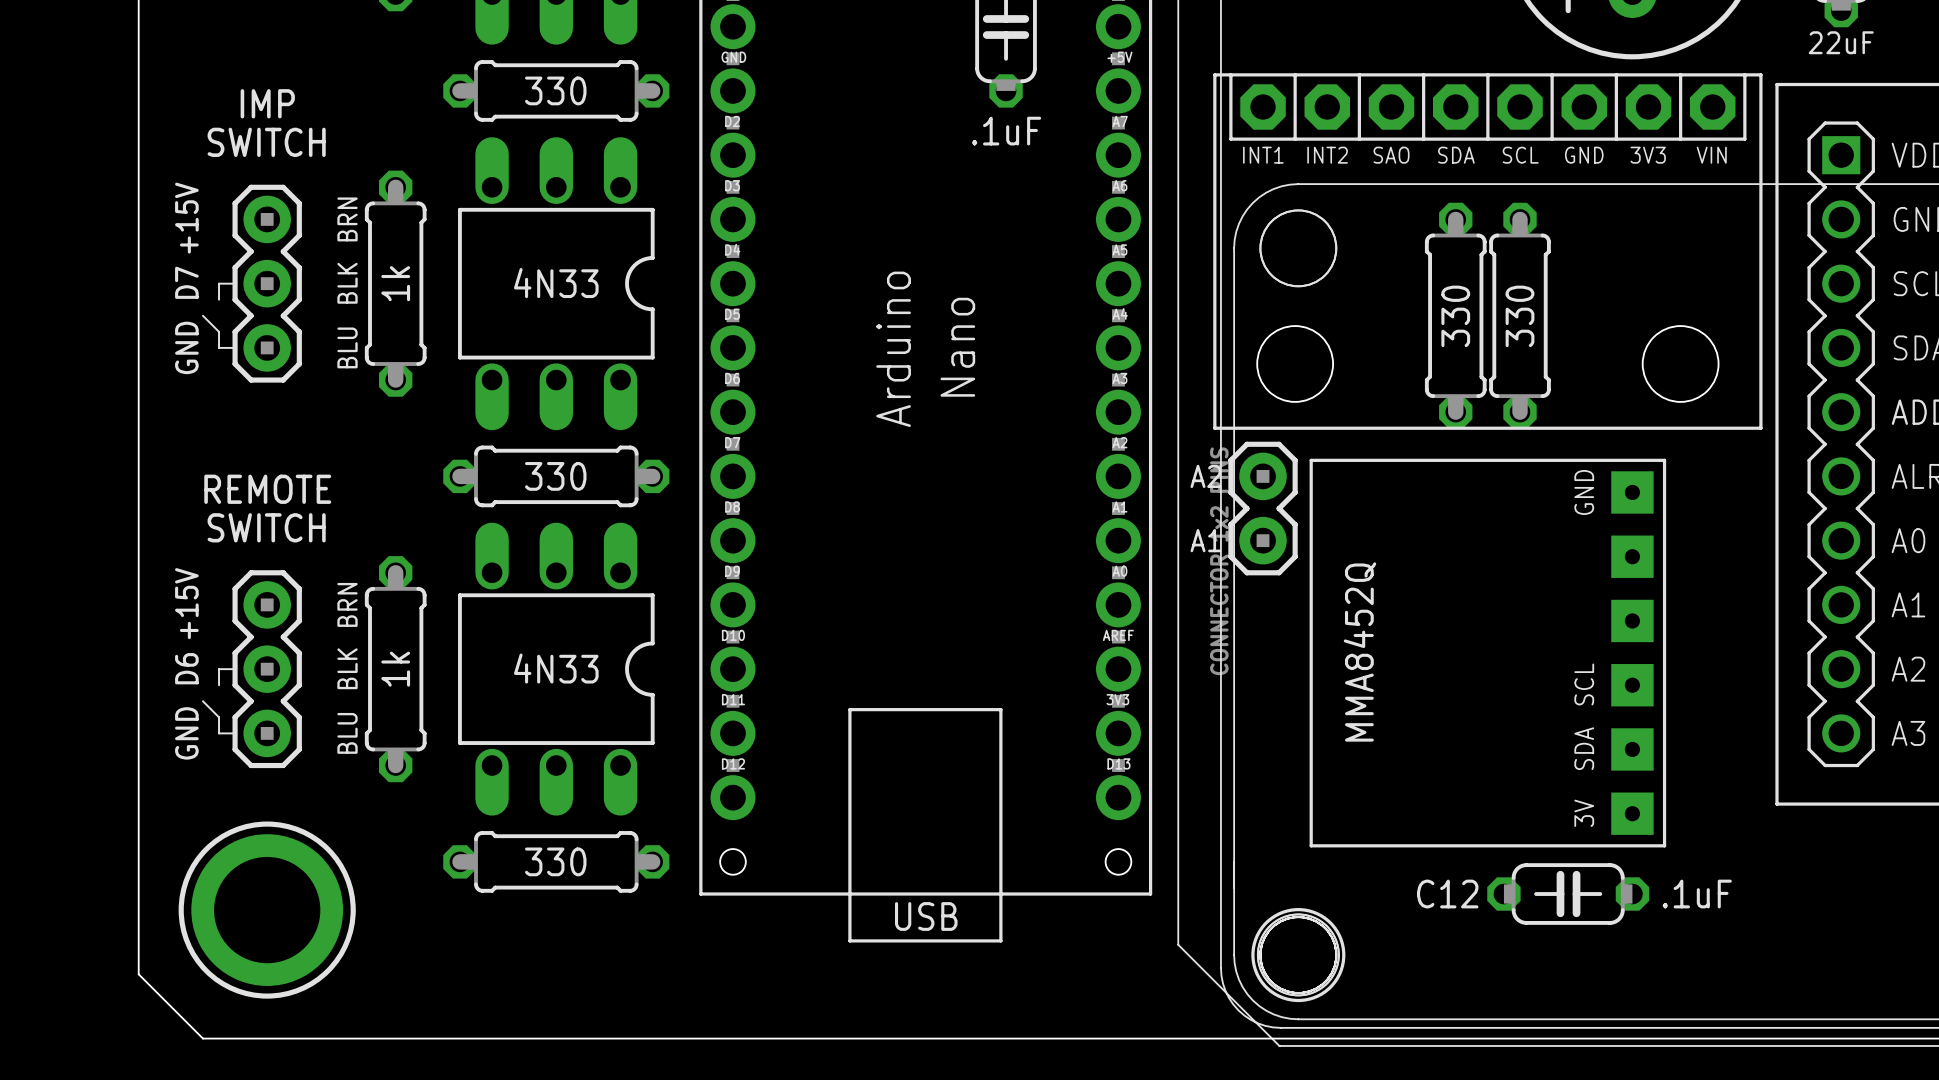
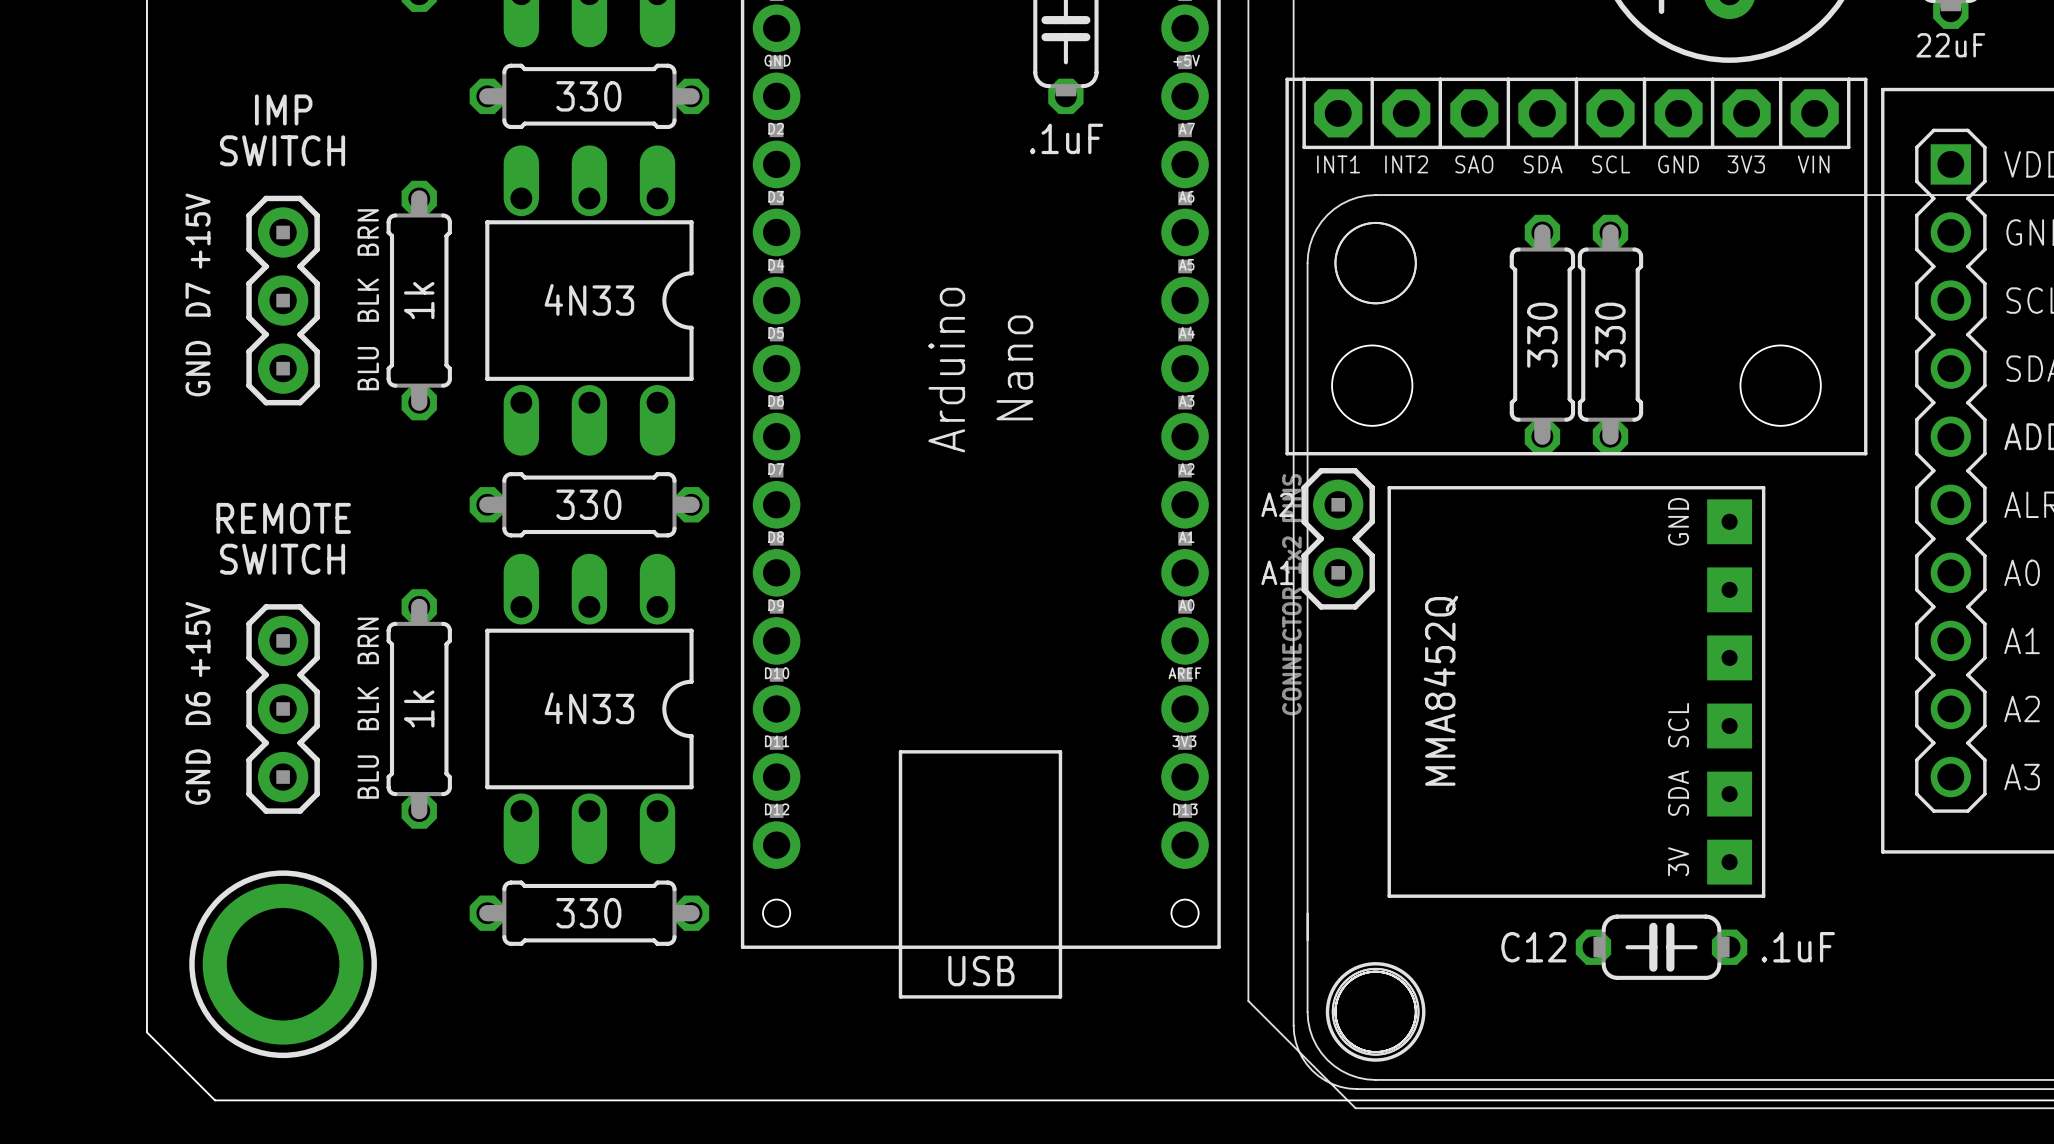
line: (235, 283) (219, 283) (219, 299) -> none
line: (202, 315) (219, 331) (219, 347) (235, 347) -> none
line: (235, 669) (219, 669) (219, 685) -> none
line: (202, 701) (219, 717) (219, 733) (235, 733) -> none

